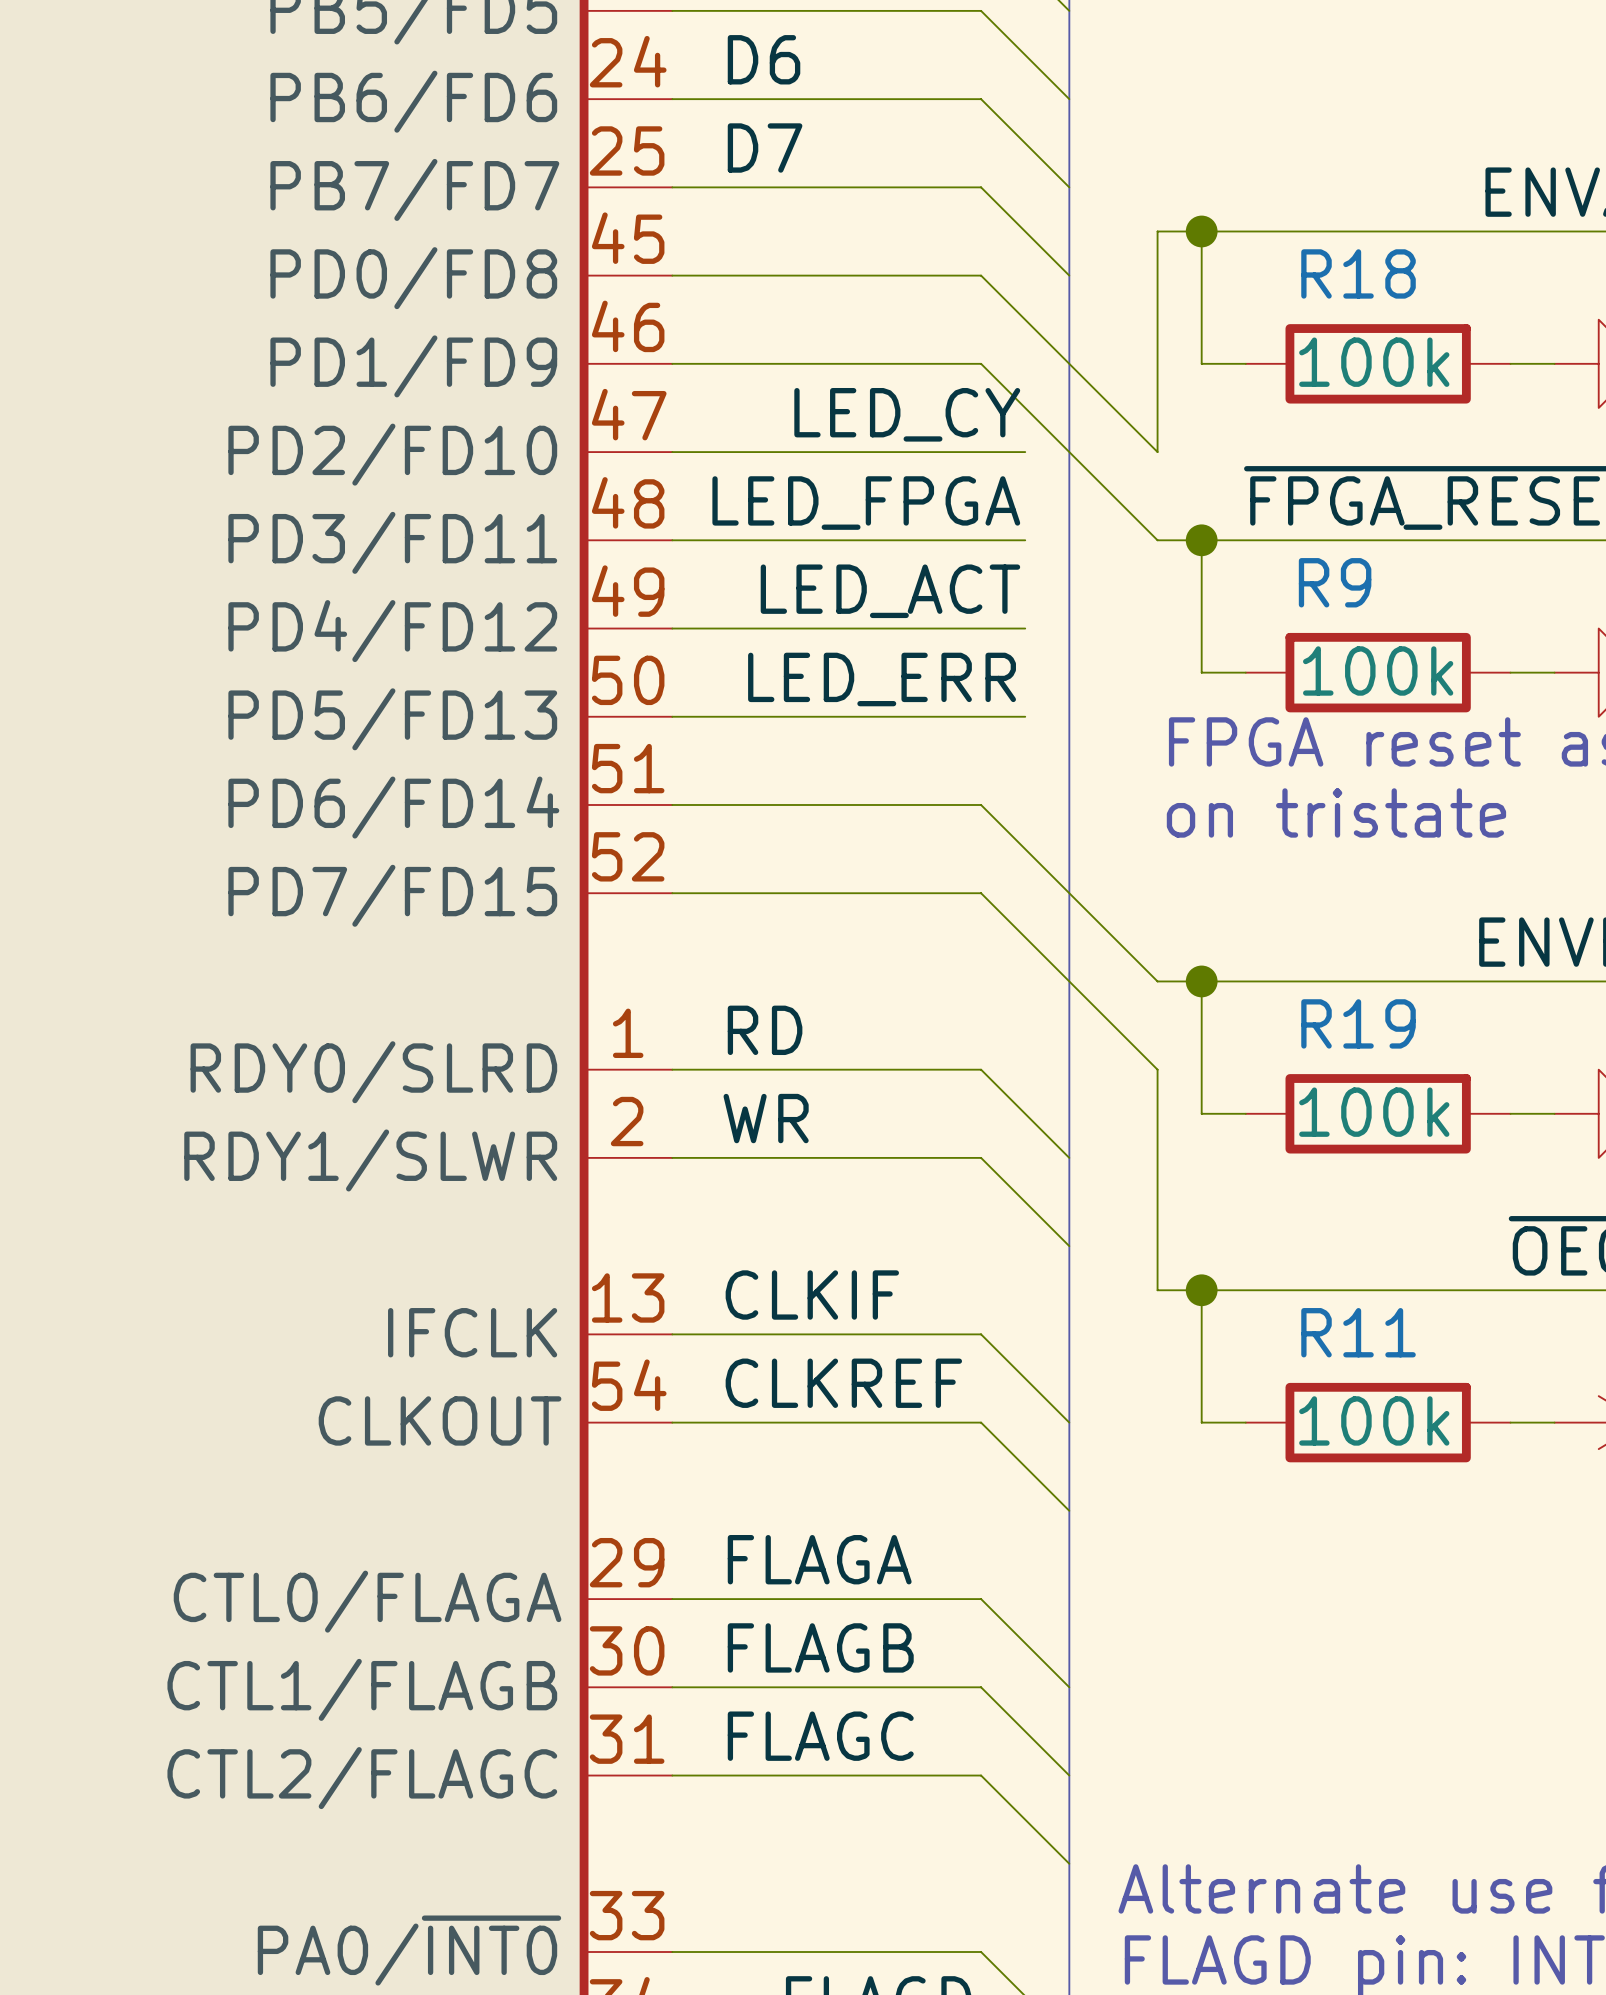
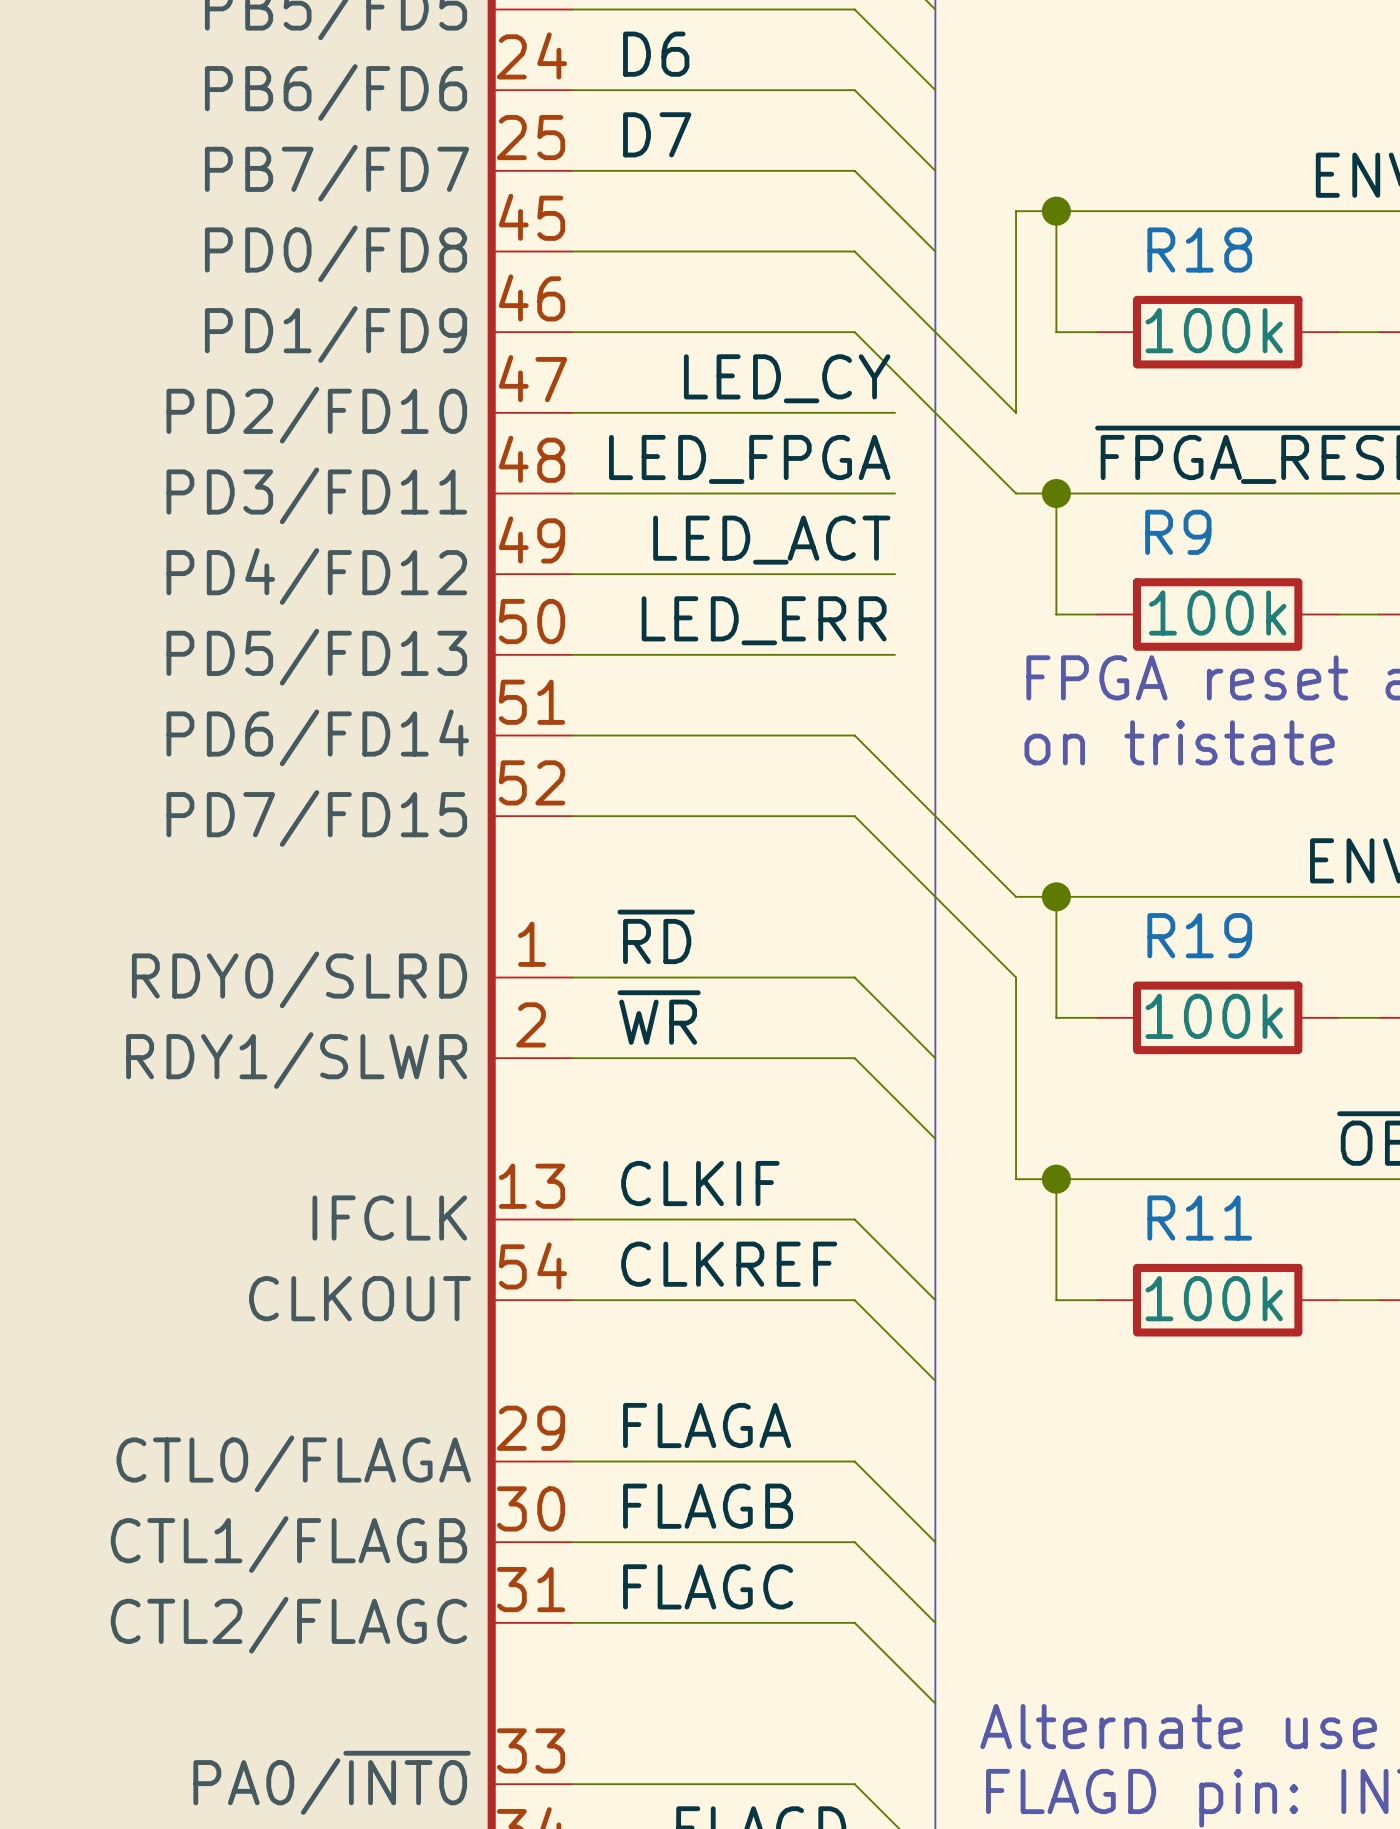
label: RD (765, 1030) -> ~{RD} (656, 936)
label: WR (766, 1118) -> ~{WR} (659, 1017)

